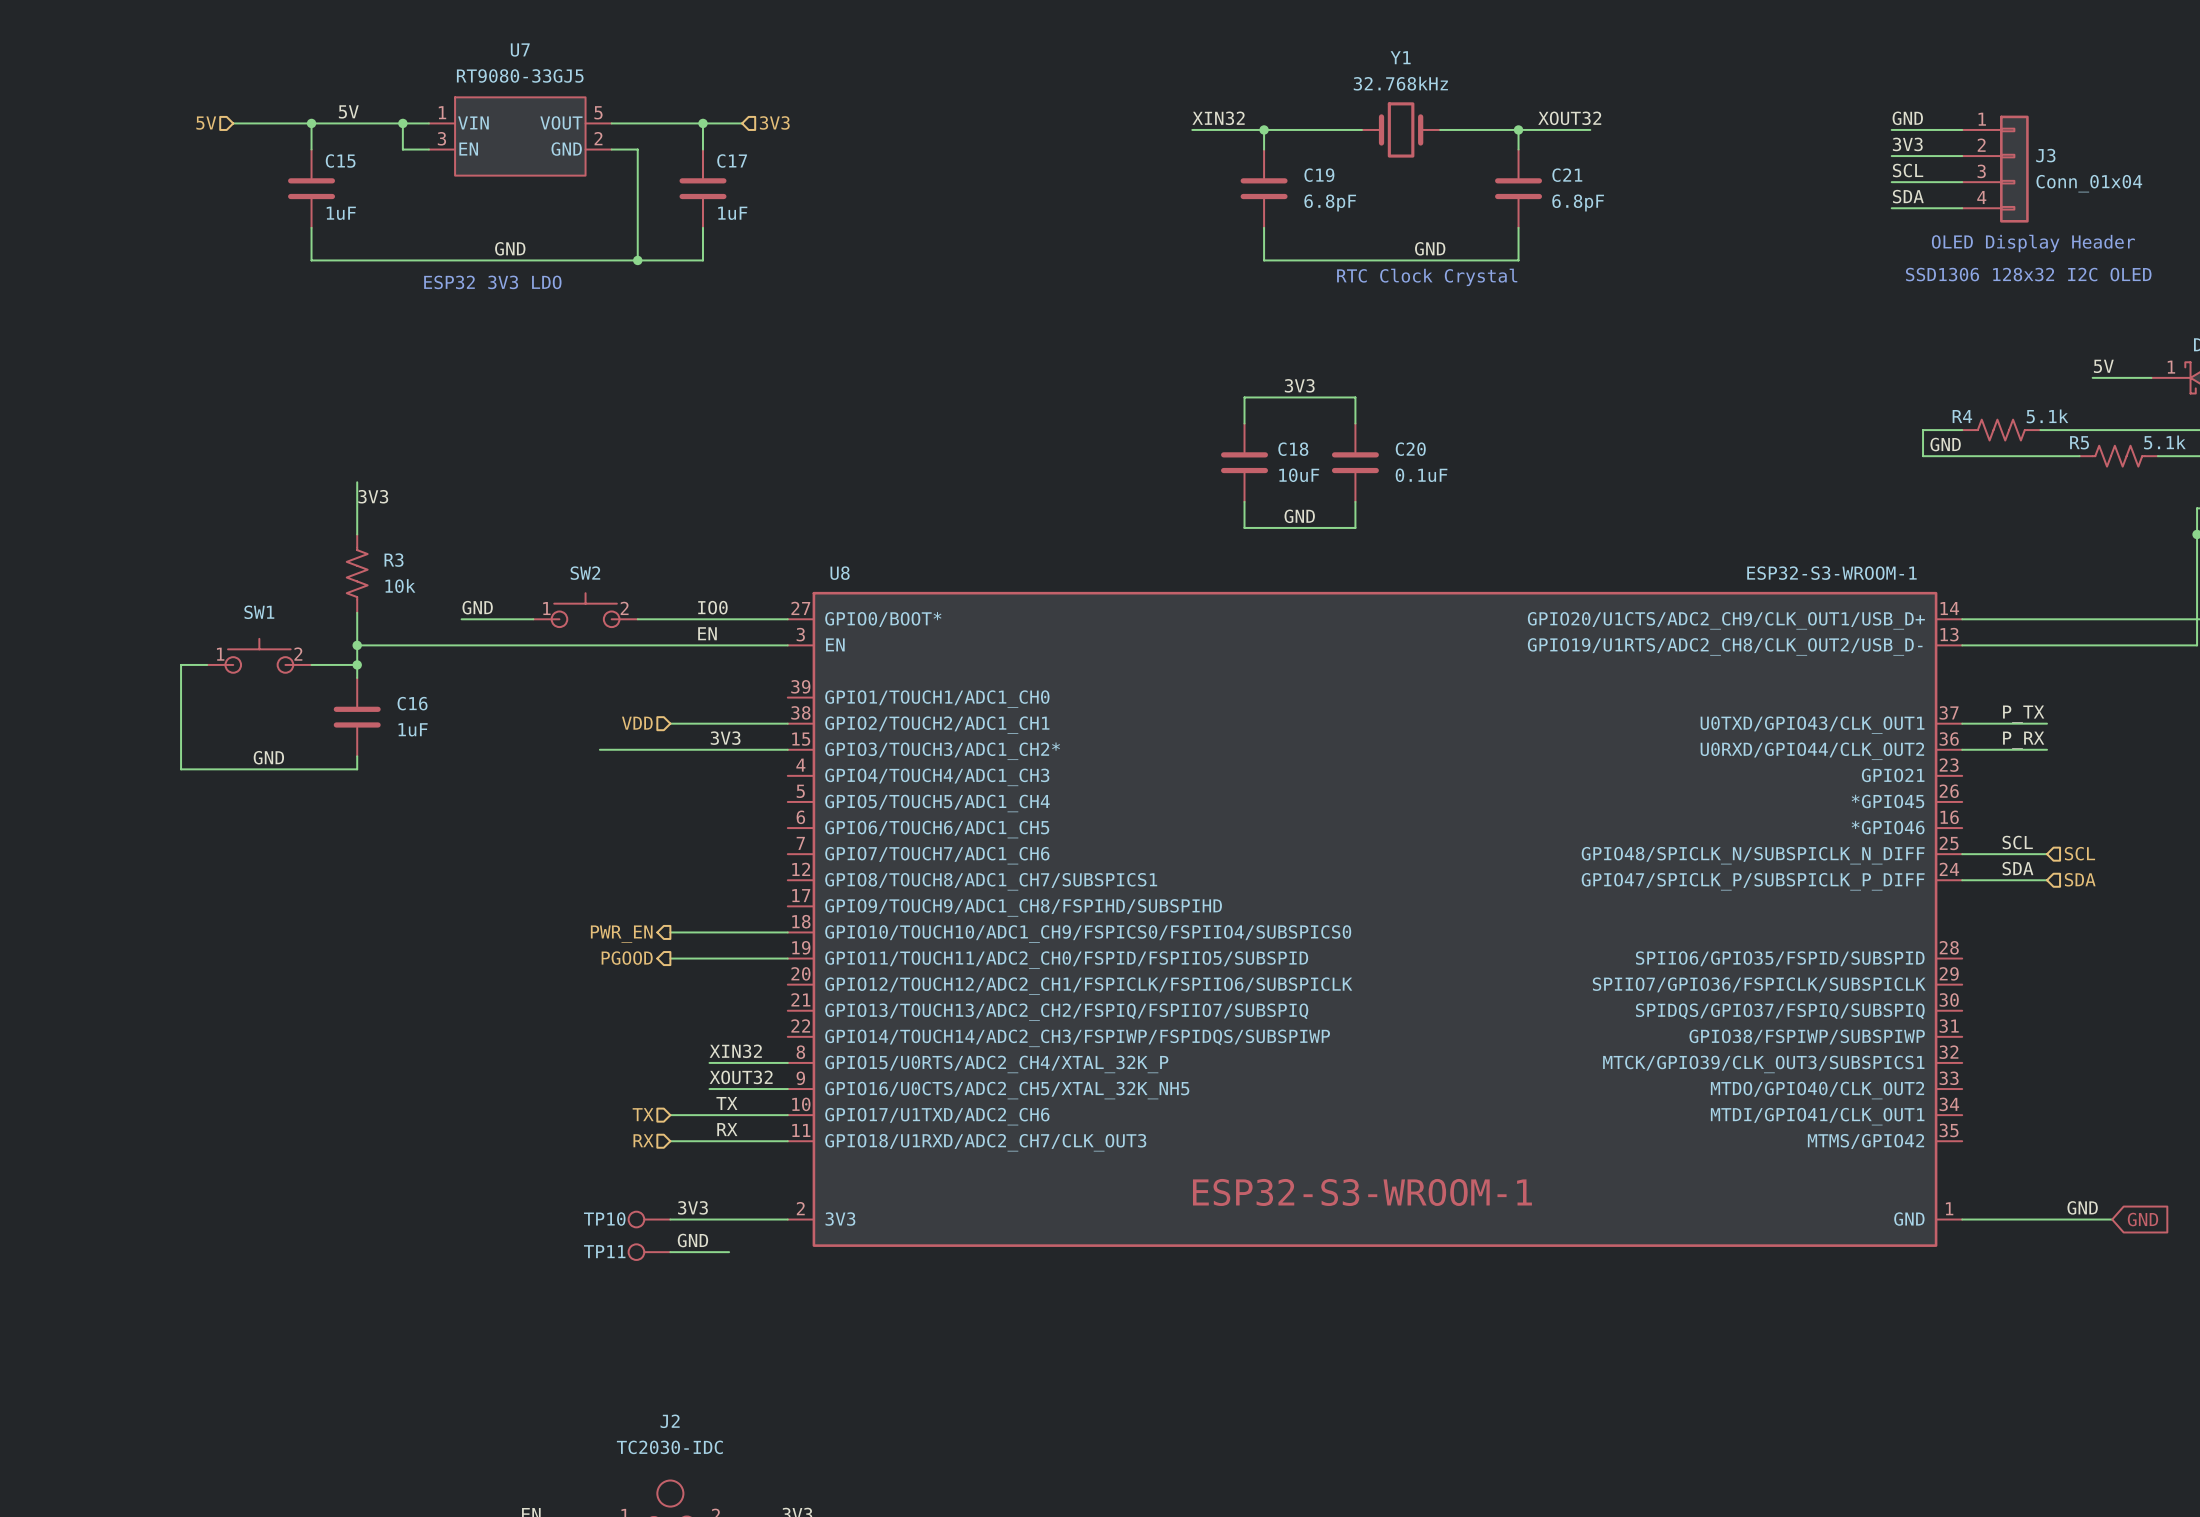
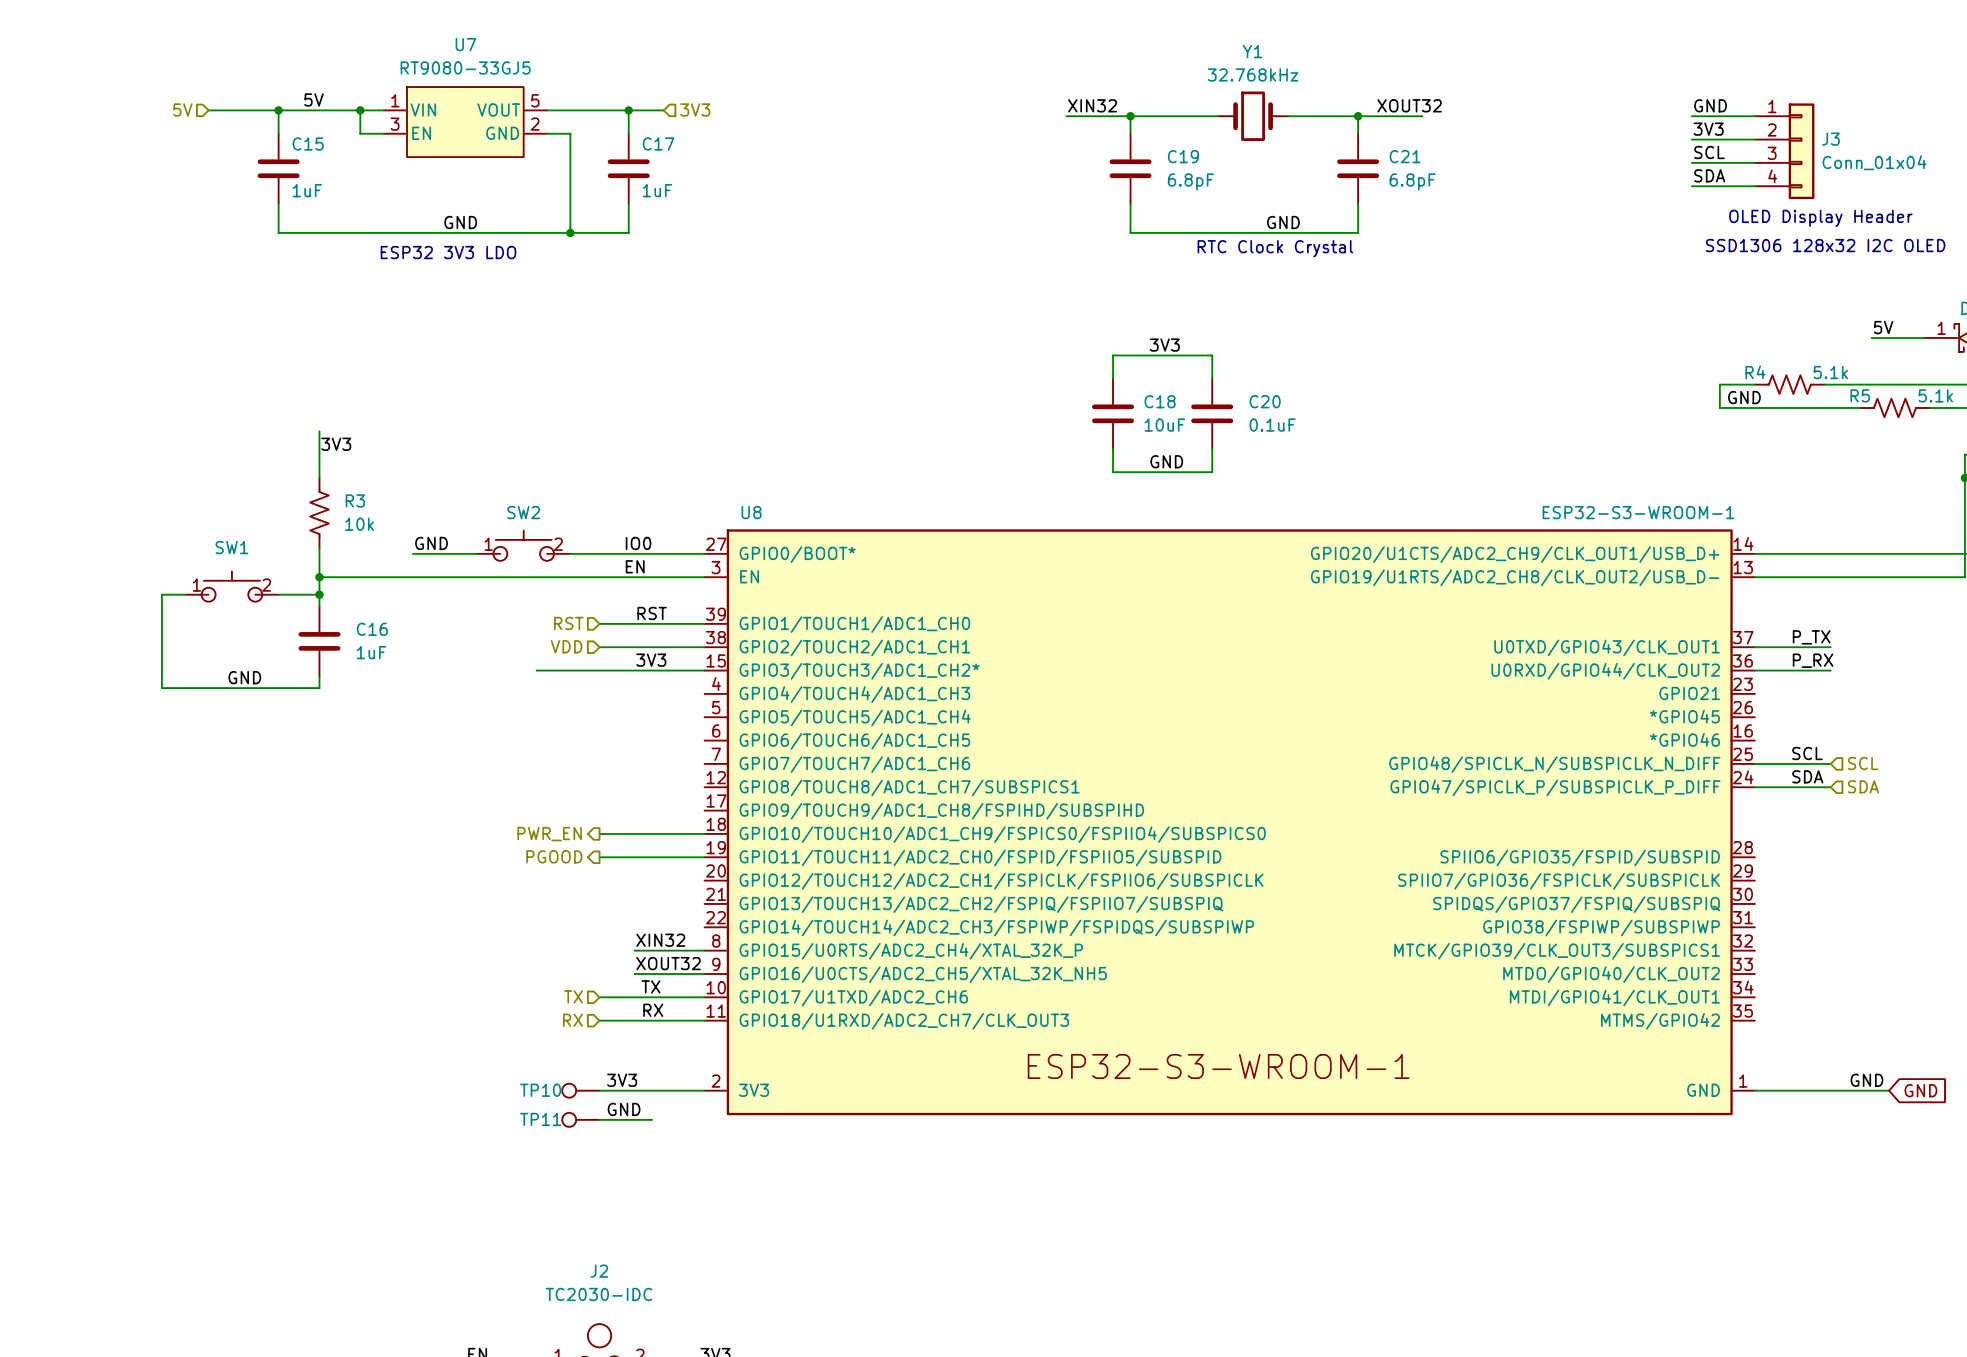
label: none -> RST (652, 613)
hierarchical label: none -> RST (568, 623)
wire: none -> (599, 623) (704, 623)

